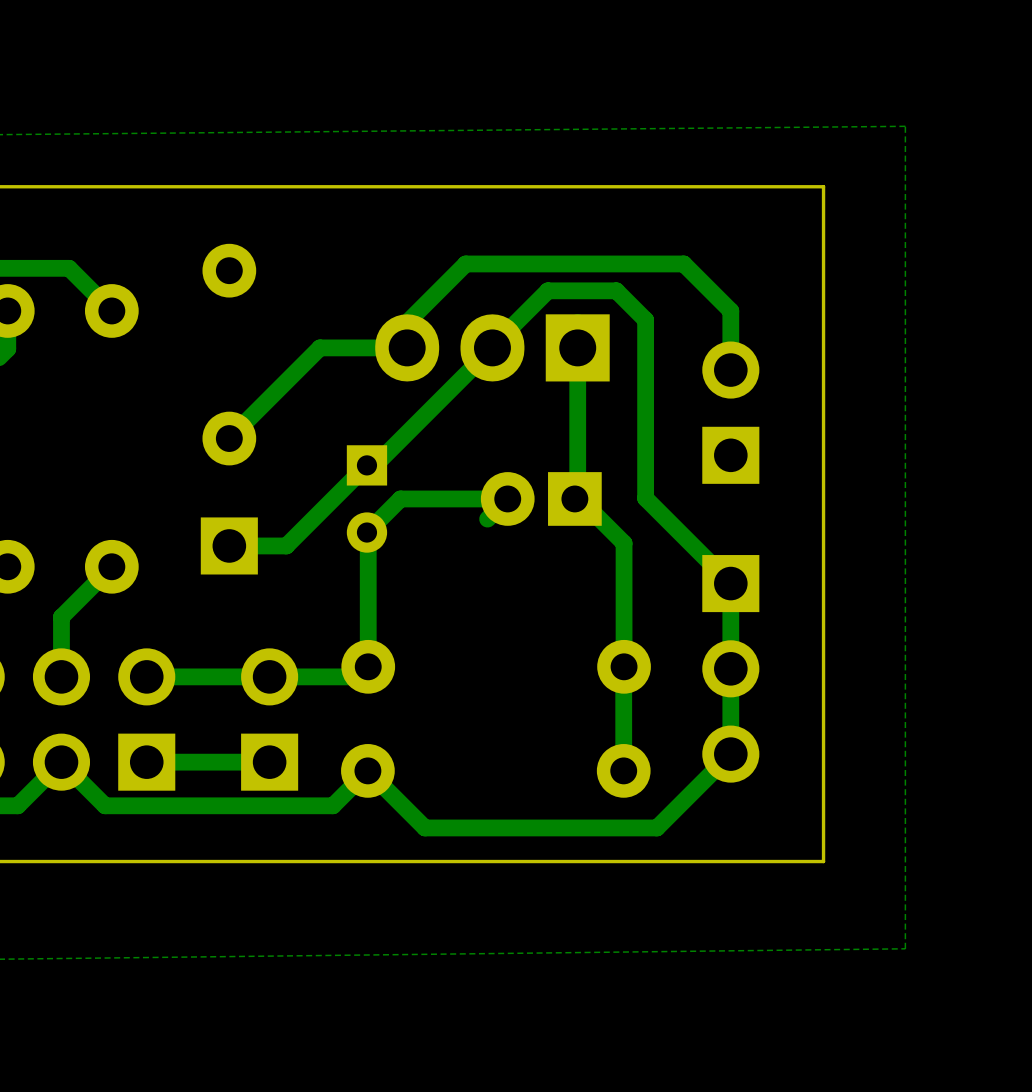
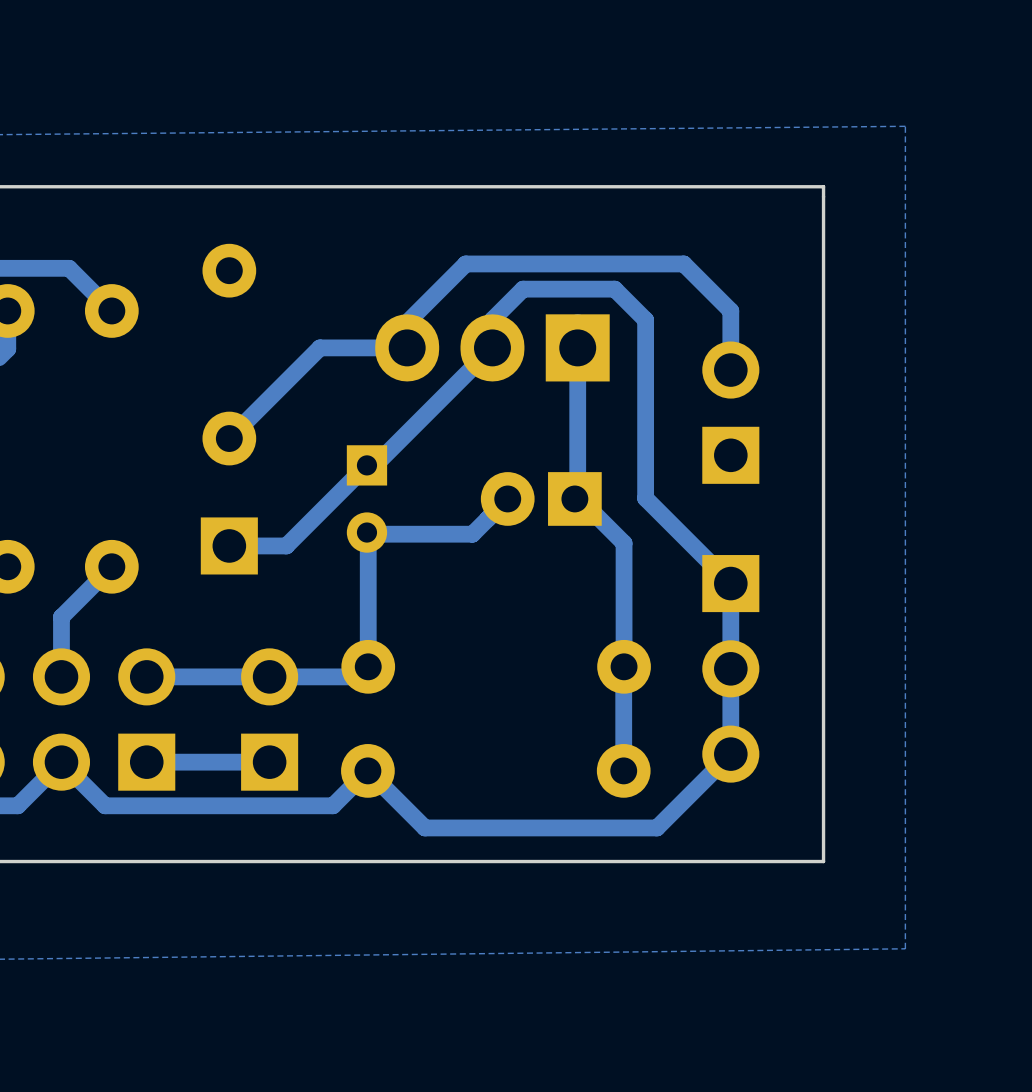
bottom track: (616, 290) (547, 290) (492, 346) -> (616, 290) (614, 289) (523, 289) (492, 319) (492, 346)
bottom track: (507, 498) (400, 498) (366, 532) -> (487, 519) (472, 534) (368, 534) (366, 532)

